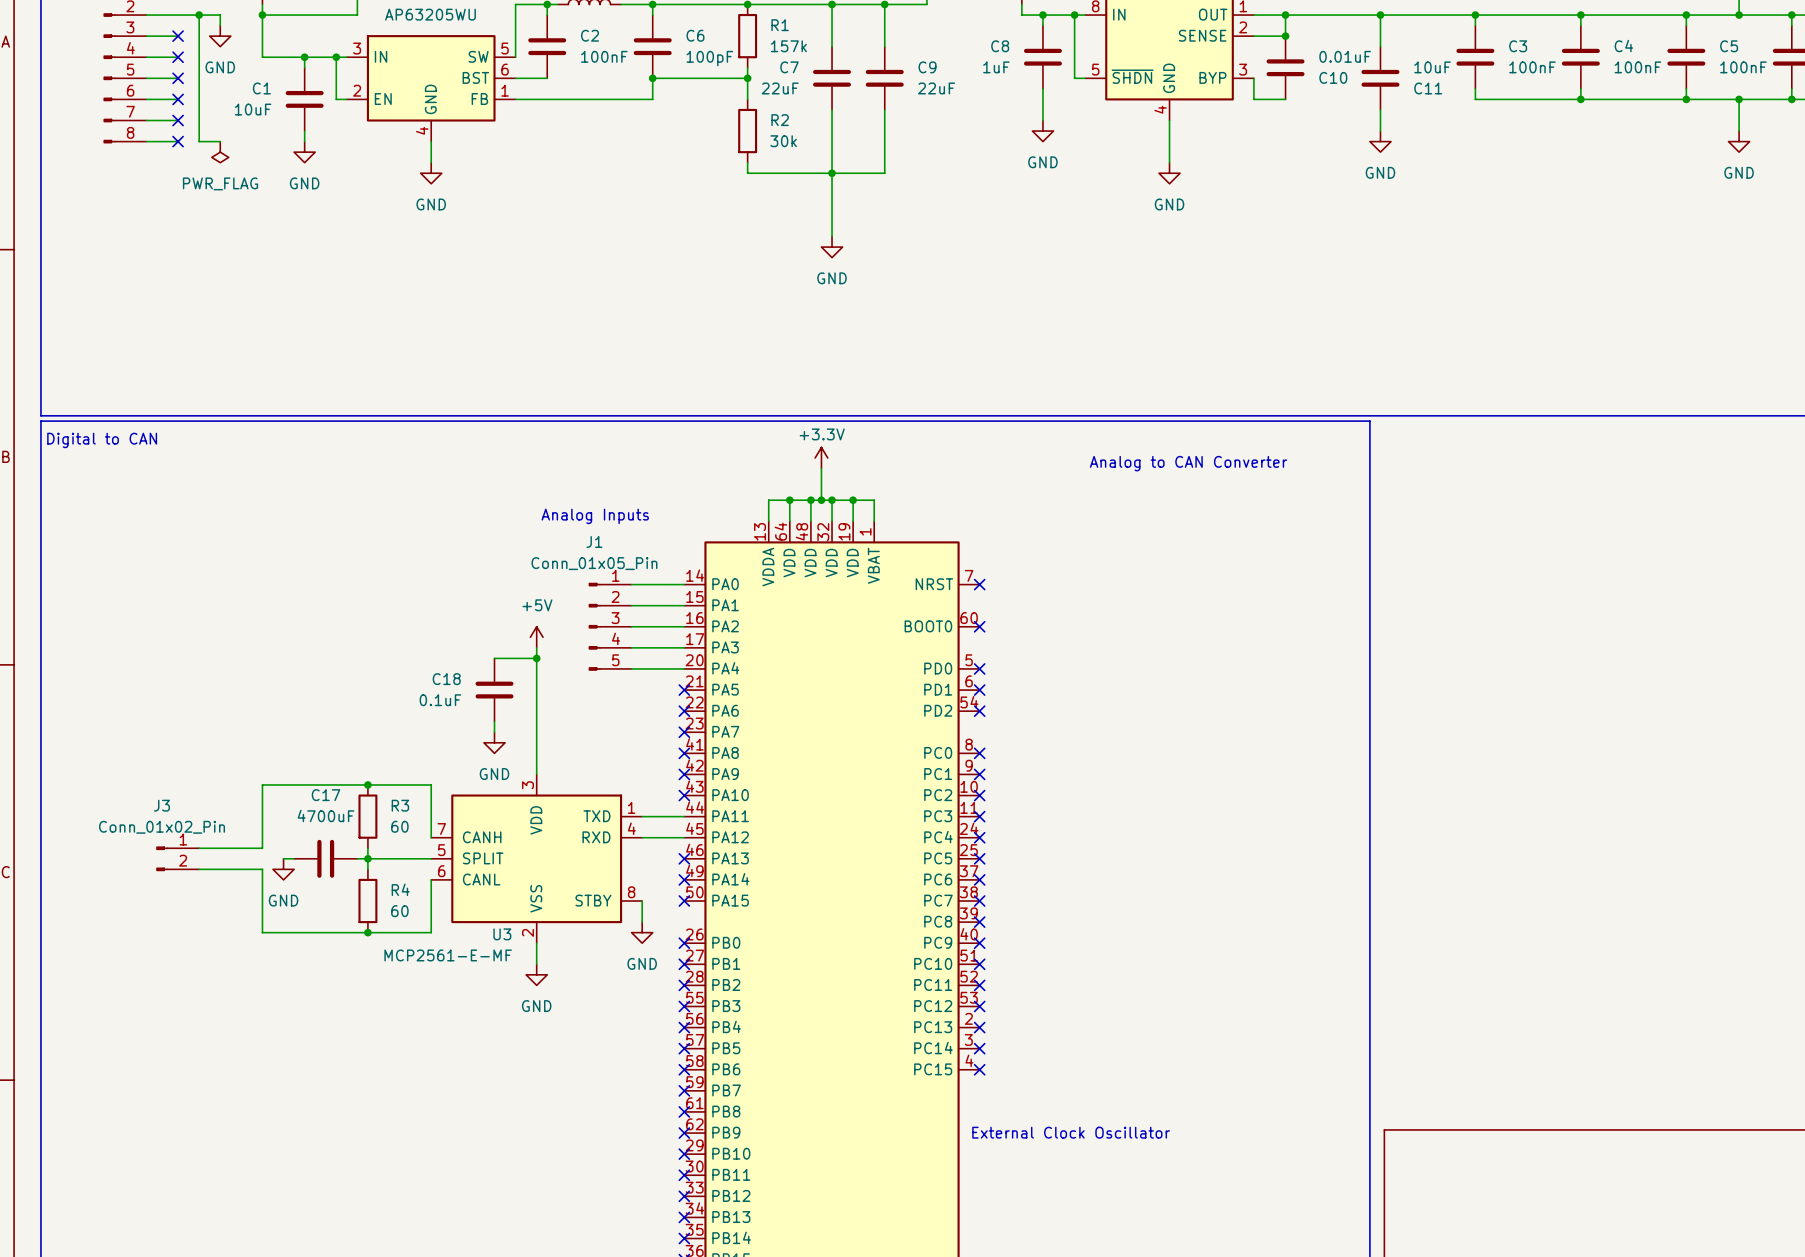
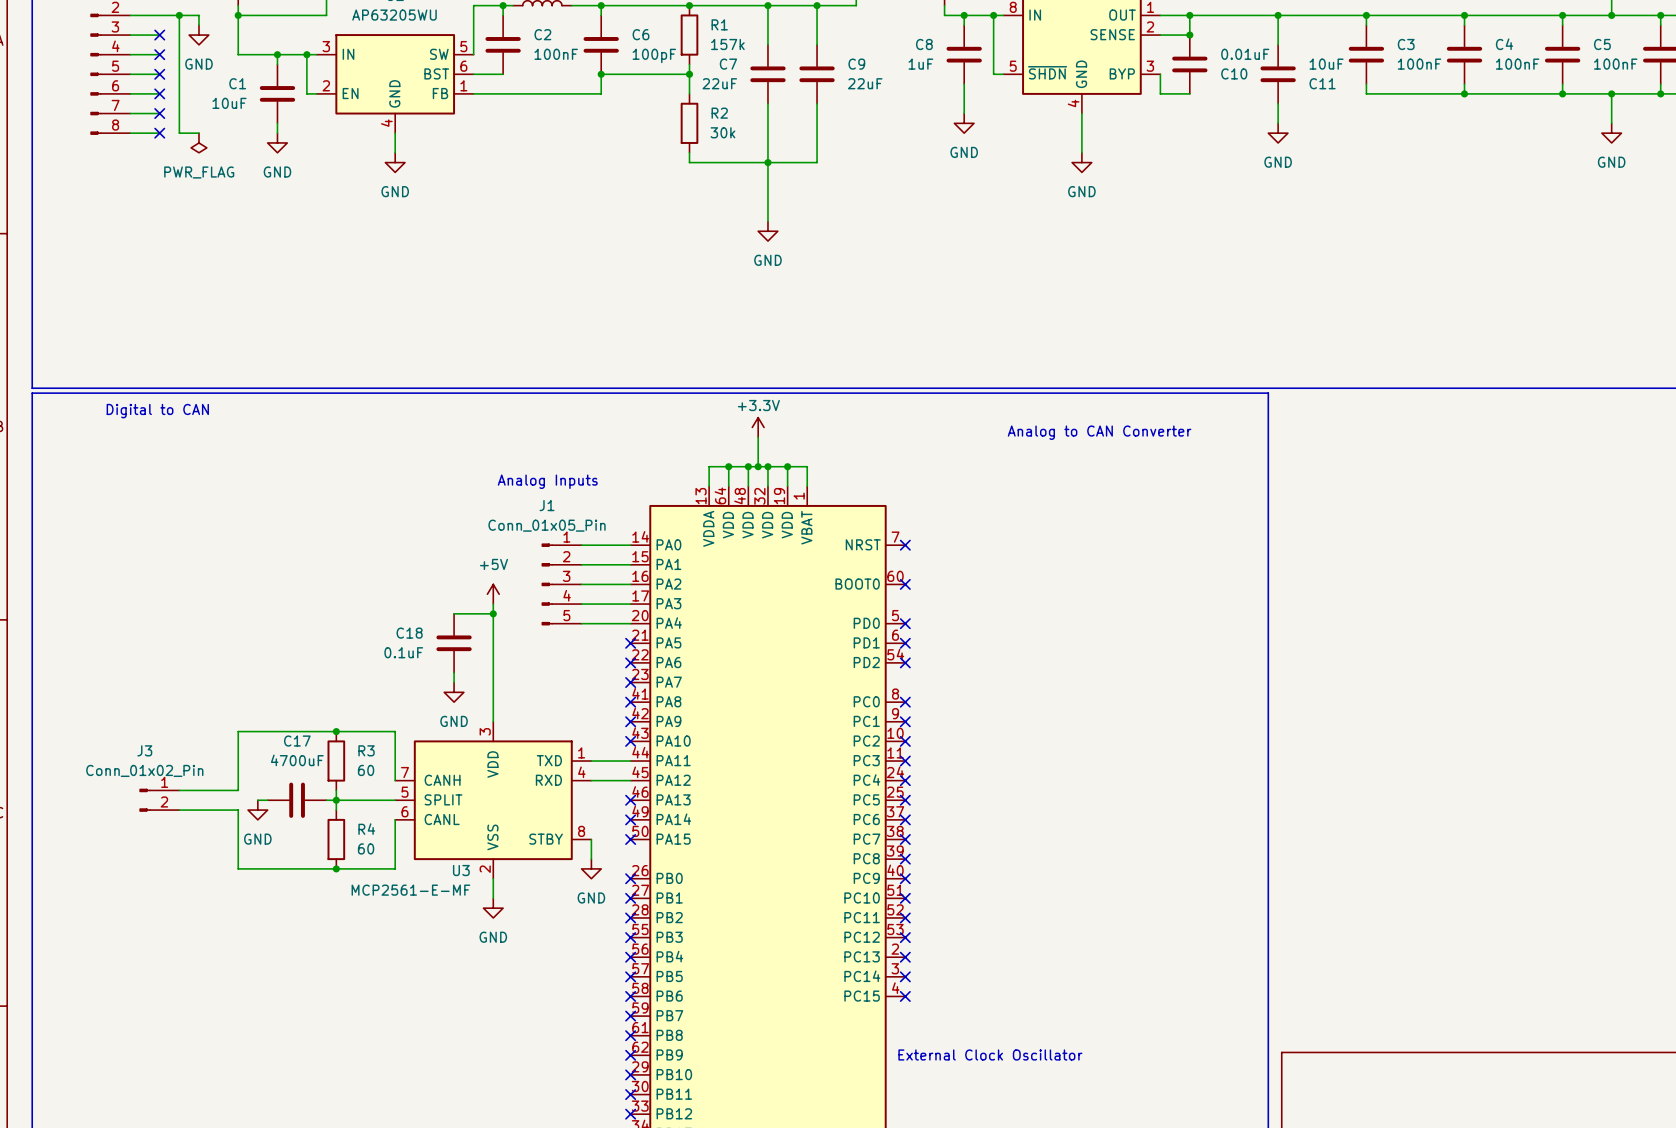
text position: Digital to CAN (102, 440) -> Digital to CAN (157, 411)

